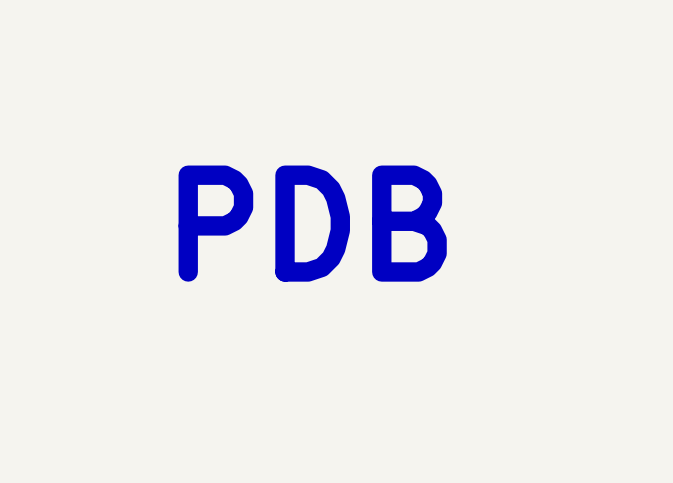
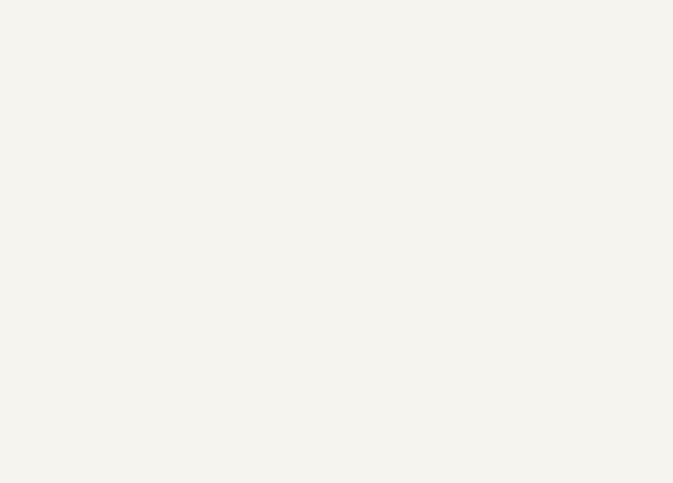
text: PDB (312, 223) -> none

